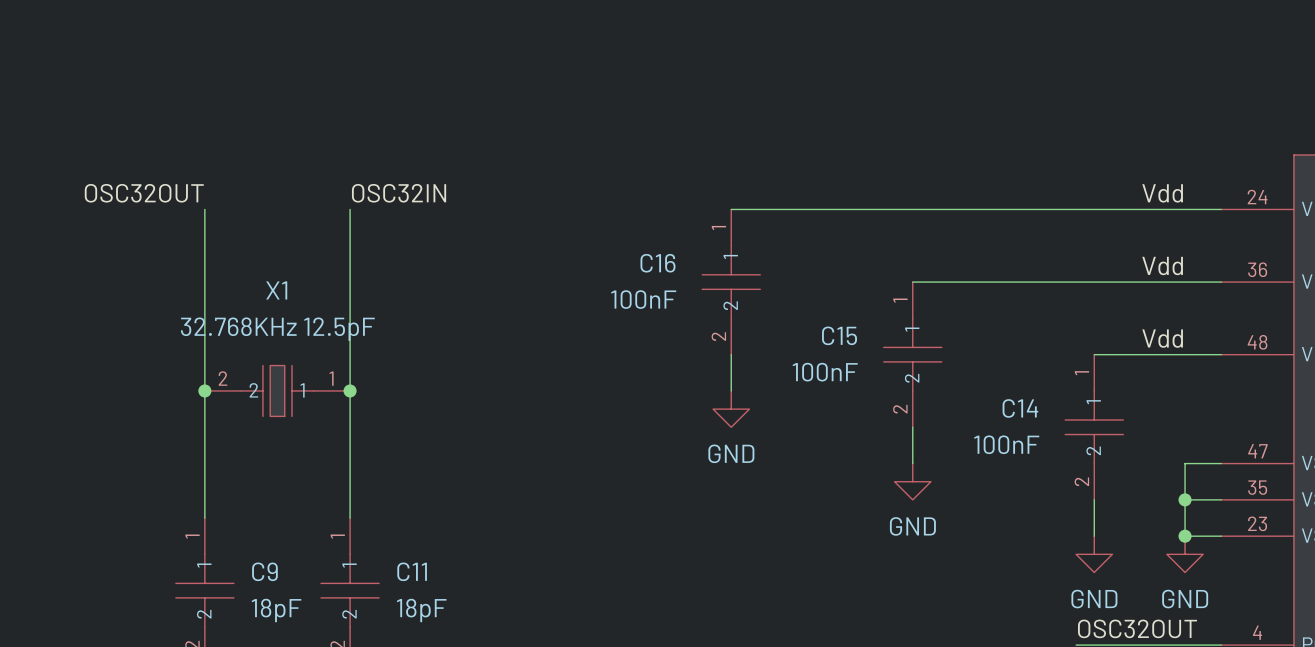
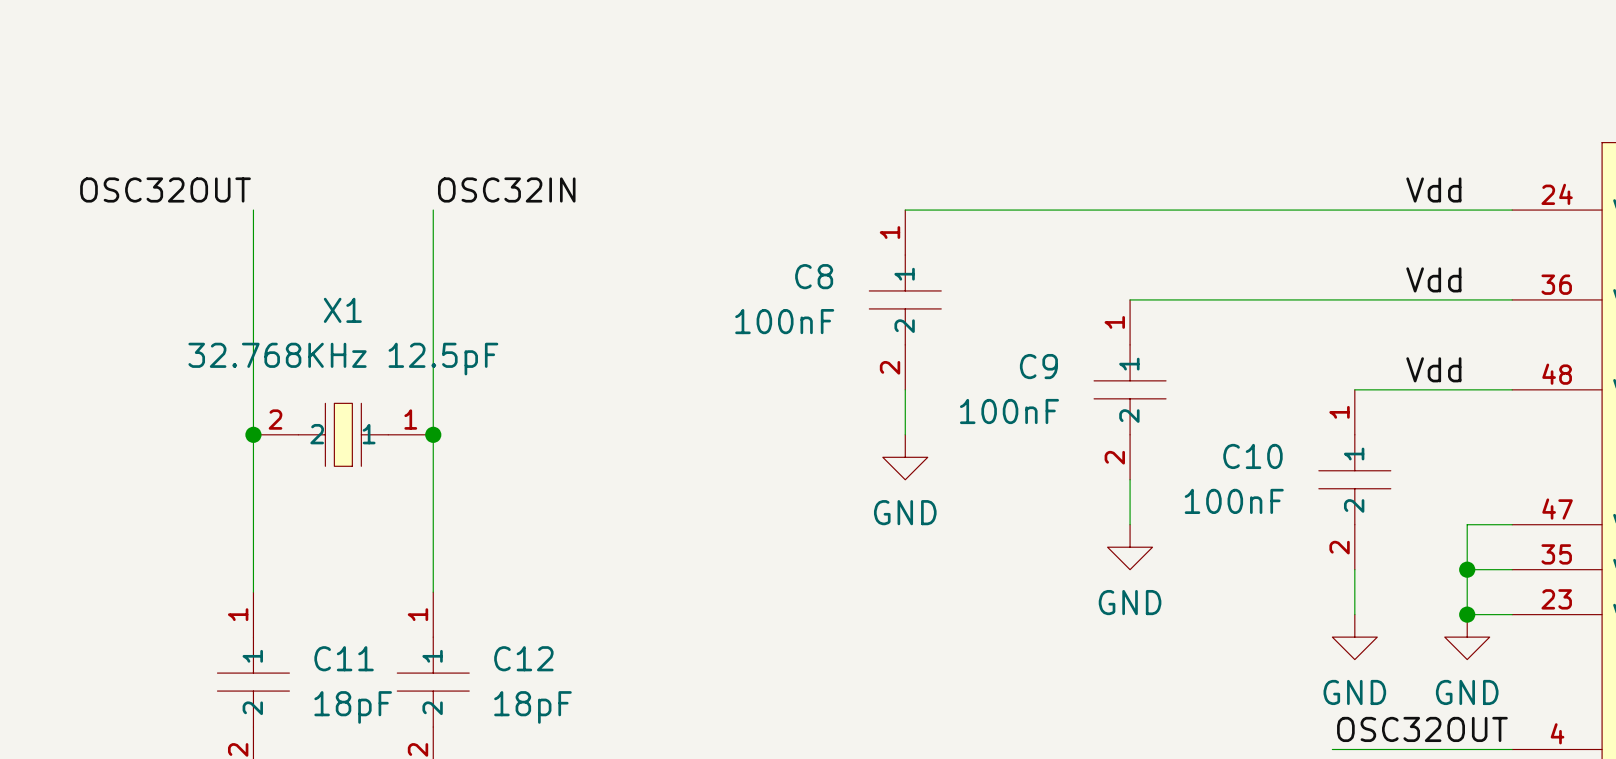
C16 name: C16 (658, 263) -> C8 (814, 276)
C15 name: C15 (839, 335) -> C9 (1038, 366)
C14 name: C14 (1020, 408) -> C10 (1252, 456)
C9 name: C9 (264, 571) -> C11 (344, 658)
C11 name: C11 (412, 571) -> C12 (523, 658)

